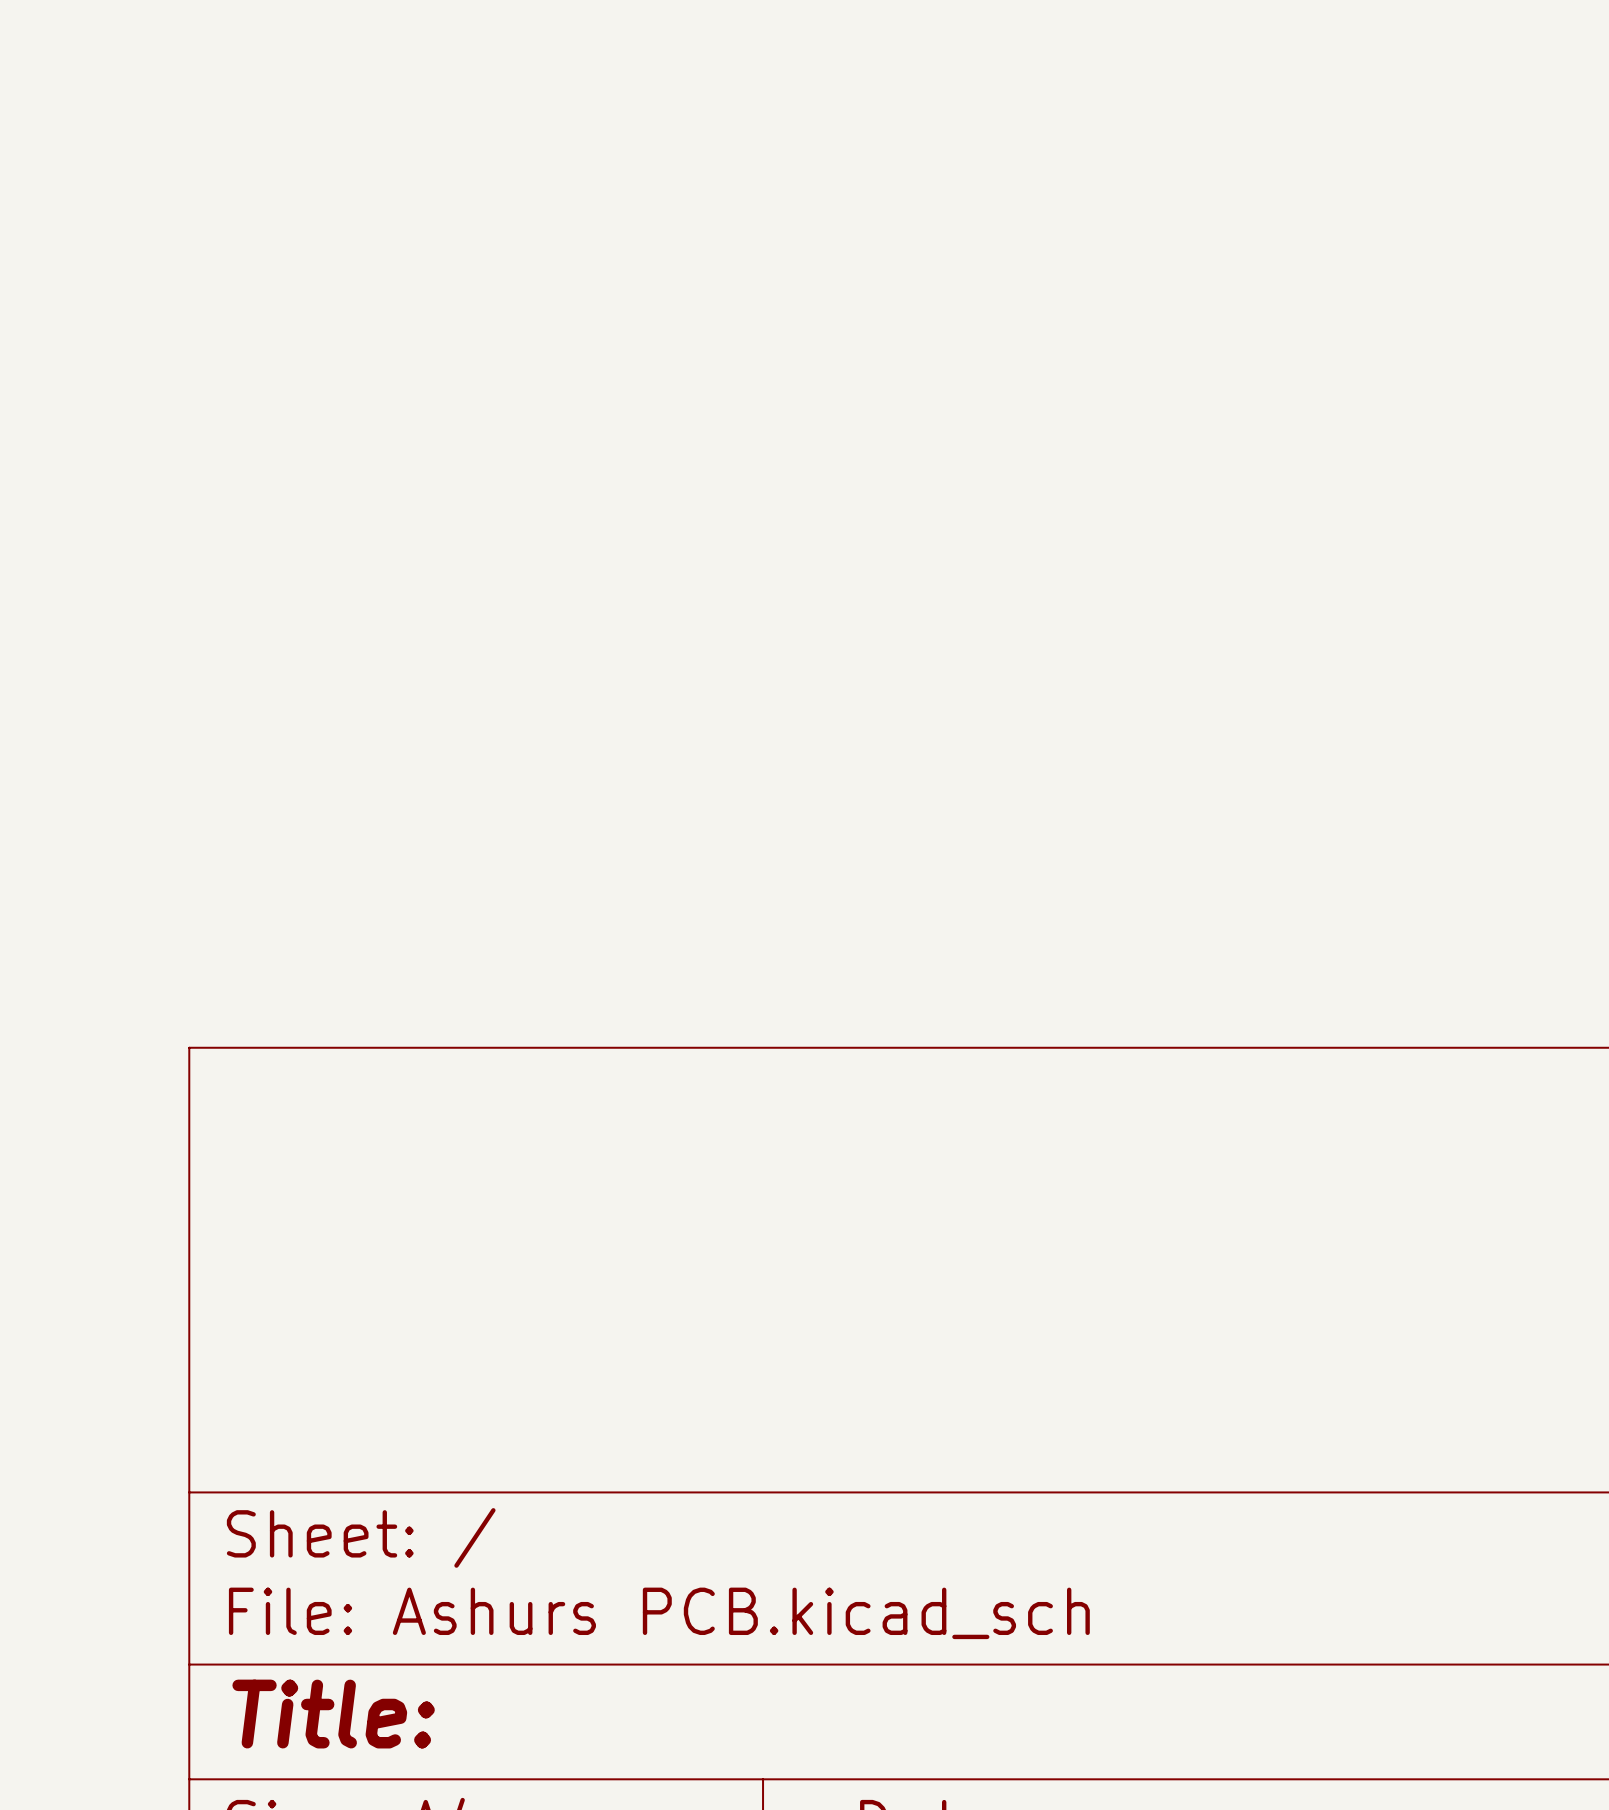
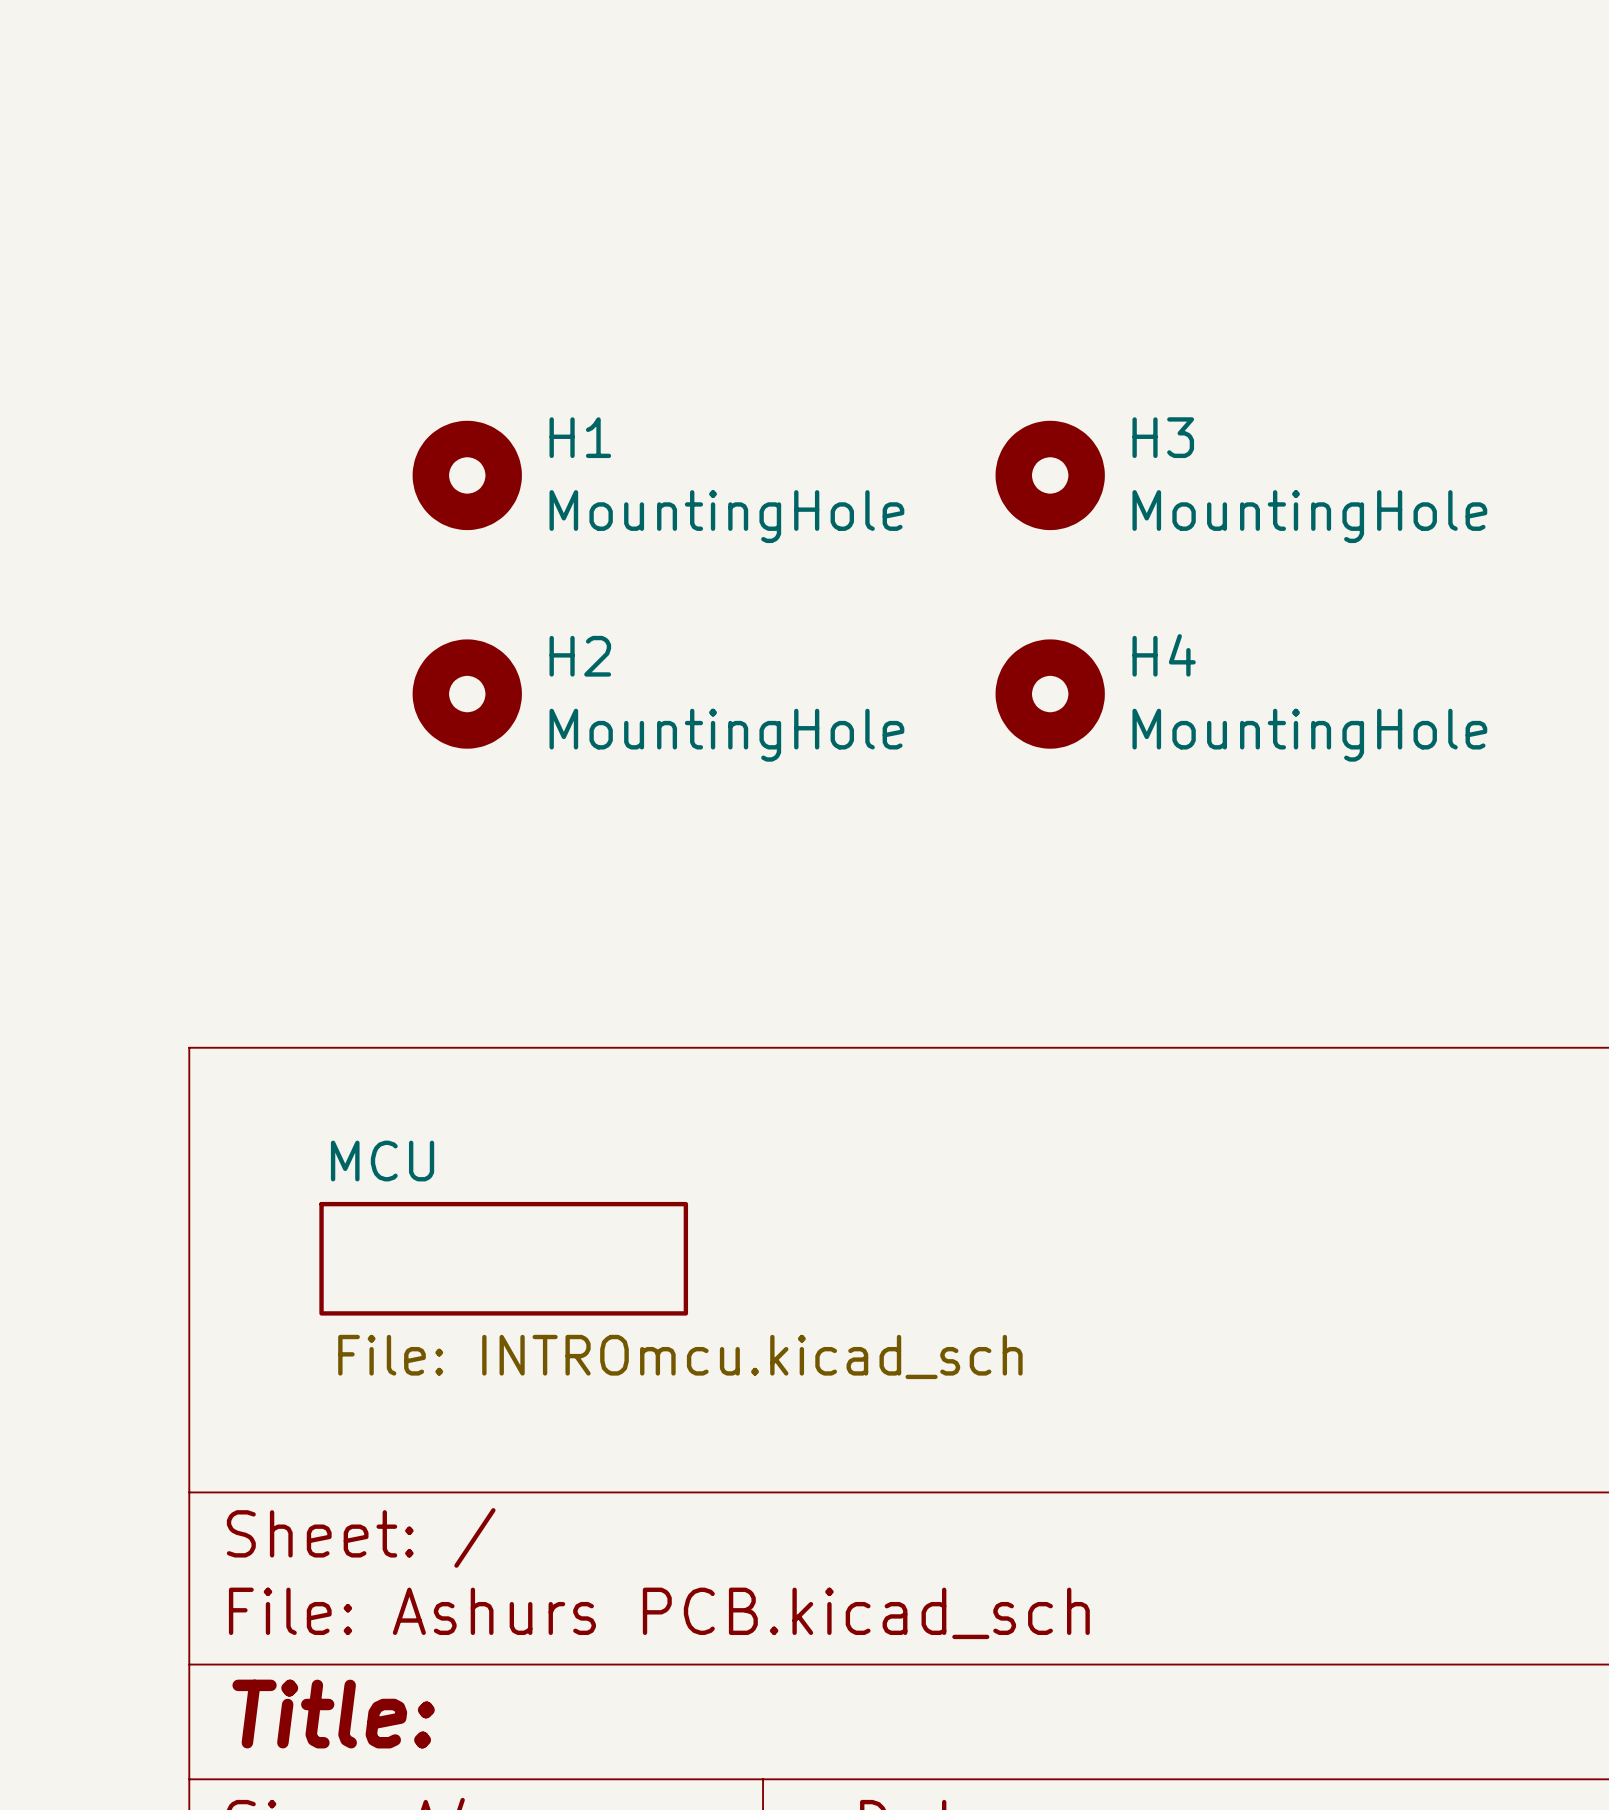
H1: none -> MountingHole (467, 475)
H3: none -> MountingHole (1050, 475)
H2: none -> MountingHole (467, 694)
H4: none -> MountingHole (1050, 694)
sheet MCU: none -> File: INTROmcu.kicad_sch (503, 1258)

